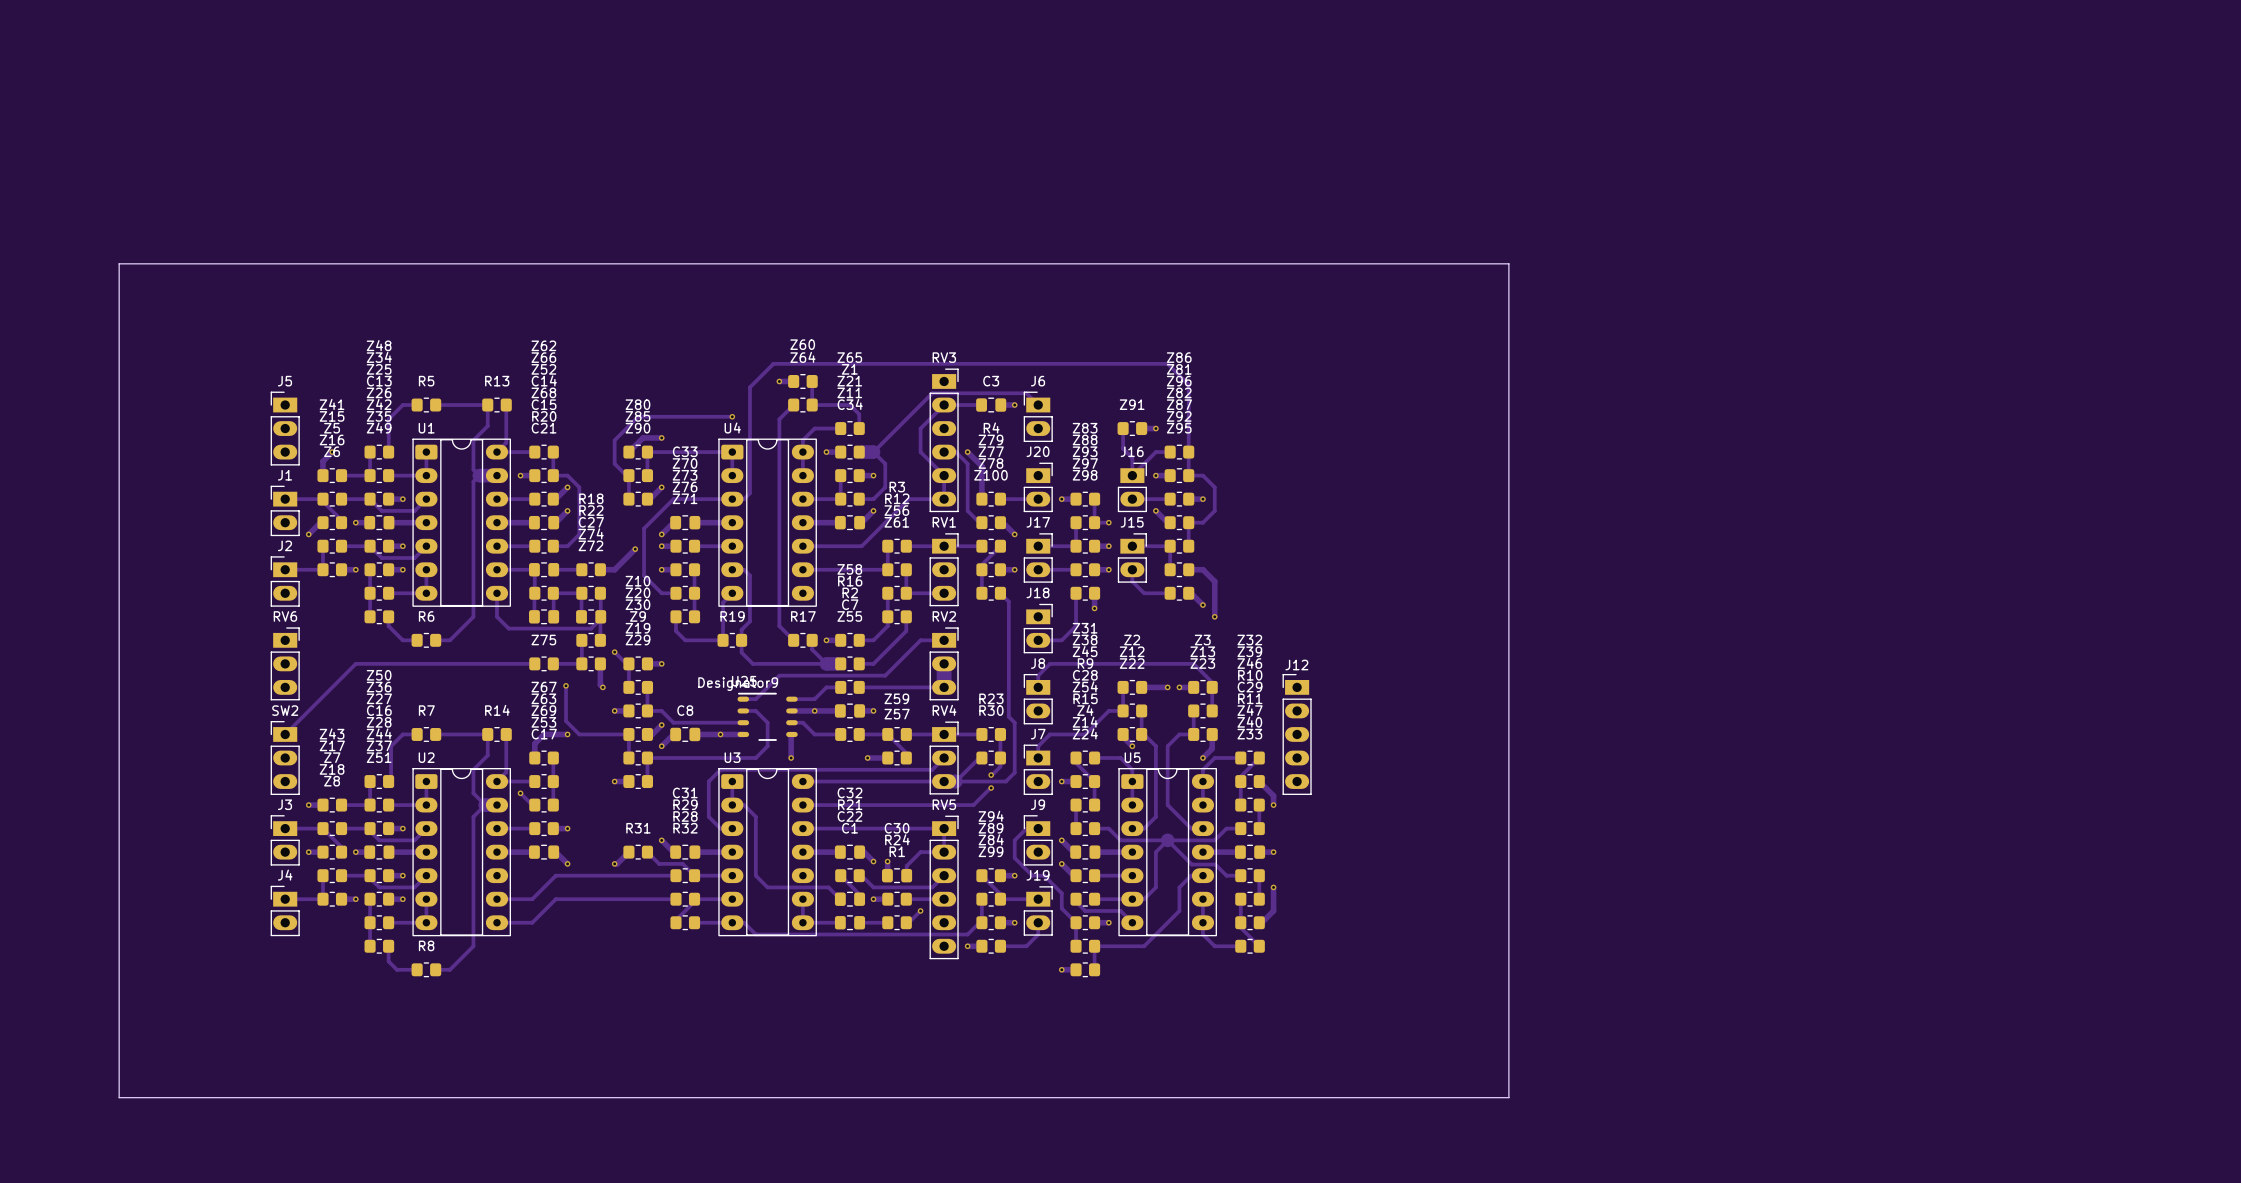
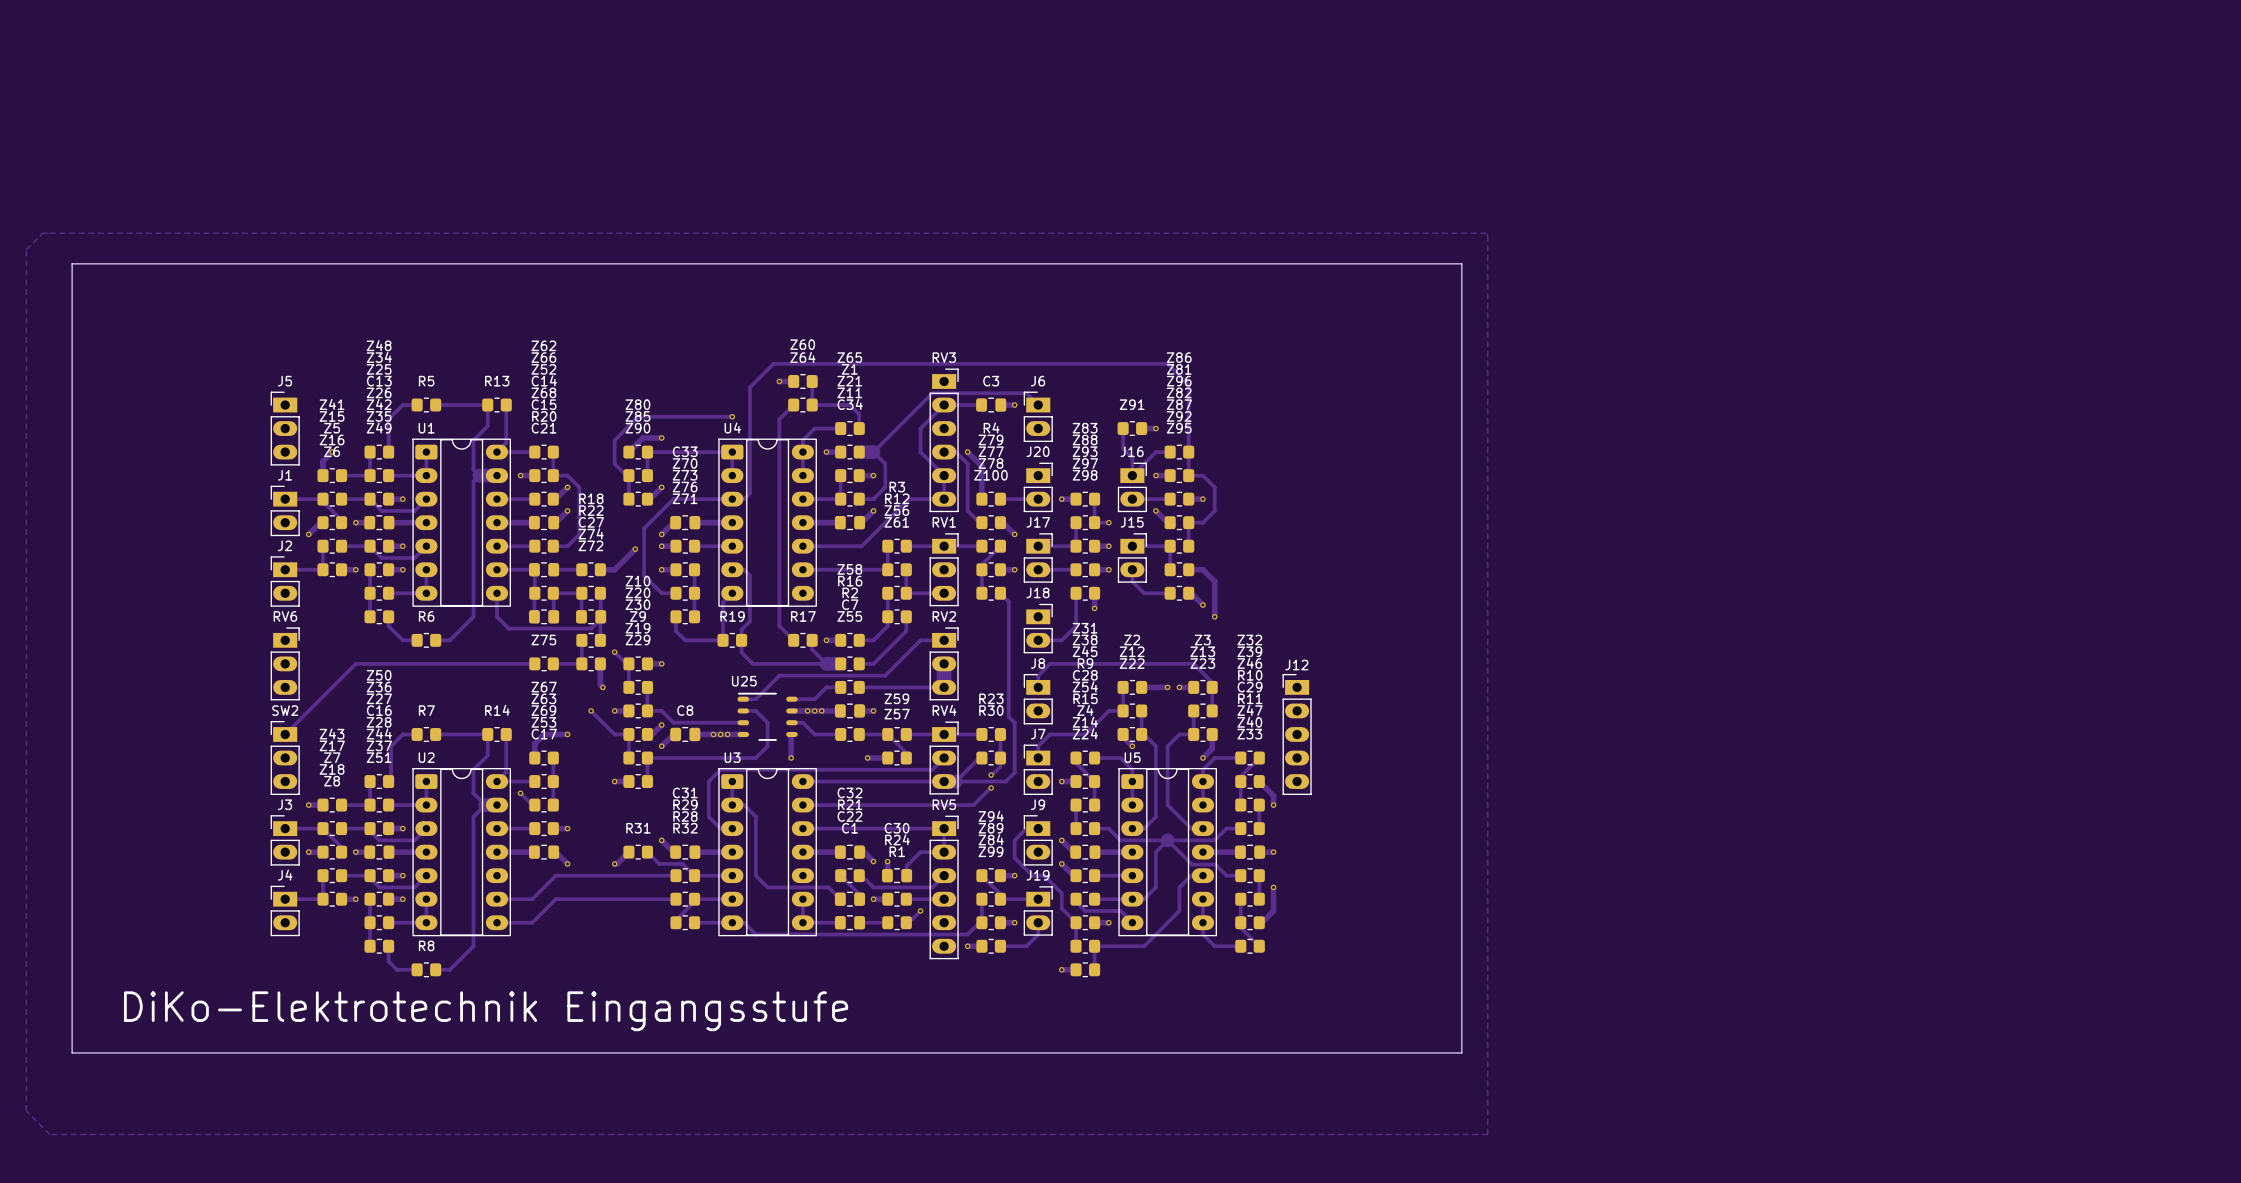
zone outline: none -> (42, 233) (26, 249) (26, 1110) (49, 1134) (1487, 1134) (1487, 235) (1485, 233) (42, 233)
board edge: (119, 263) (119, 1097) (1508, 1097) (1508, 263) (1461, 263) -> (119, 263) (72, 263) (72, 1052) (1461, 1052) (1461, 263)
U25 text: Designator9 (738, 684) -> none
track: (566, 685) (566, 721) (579, 734) (614, 734) -> (591, 710) (614, 734)
via position: (566, 685) -> (591, 710)
via: none -> (807, 710)
via: none -> (821, 710)
via: none -> (713, 734)
via: none -> (727, 734)
text: none -> DiKo-Elektrotechnik Eingangsstufe (486, 1011)

